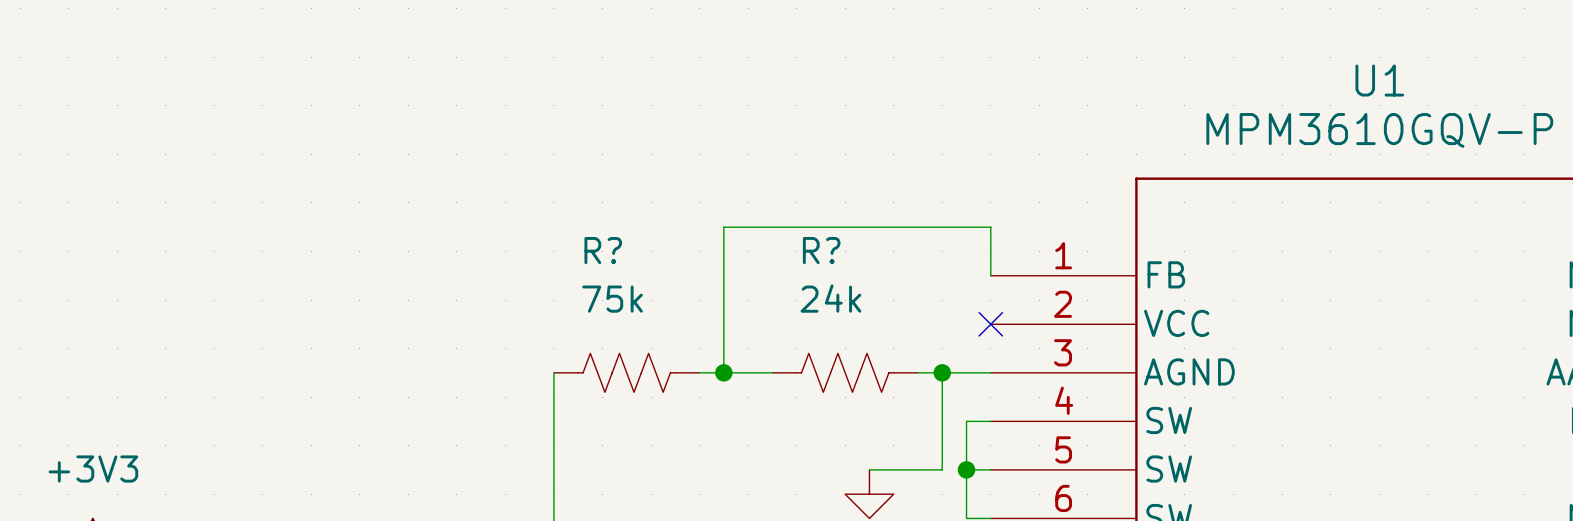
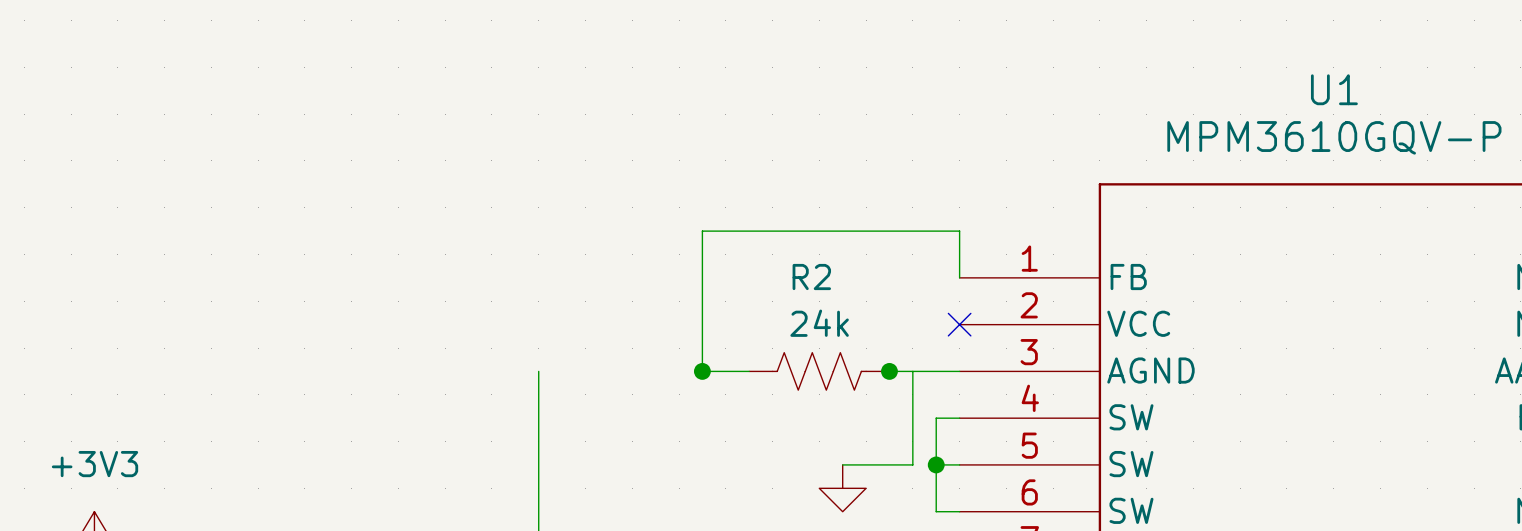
R? name: R? (821, 250) -> R2 (811, 277)
R? value position: 24k (830, 298) -> 24k (819, 323)
R?: 75k (626, 372) -> none
wire: (699, 372) (723, 372) -> none
junction position: (942, 372) -> (889, 371)

